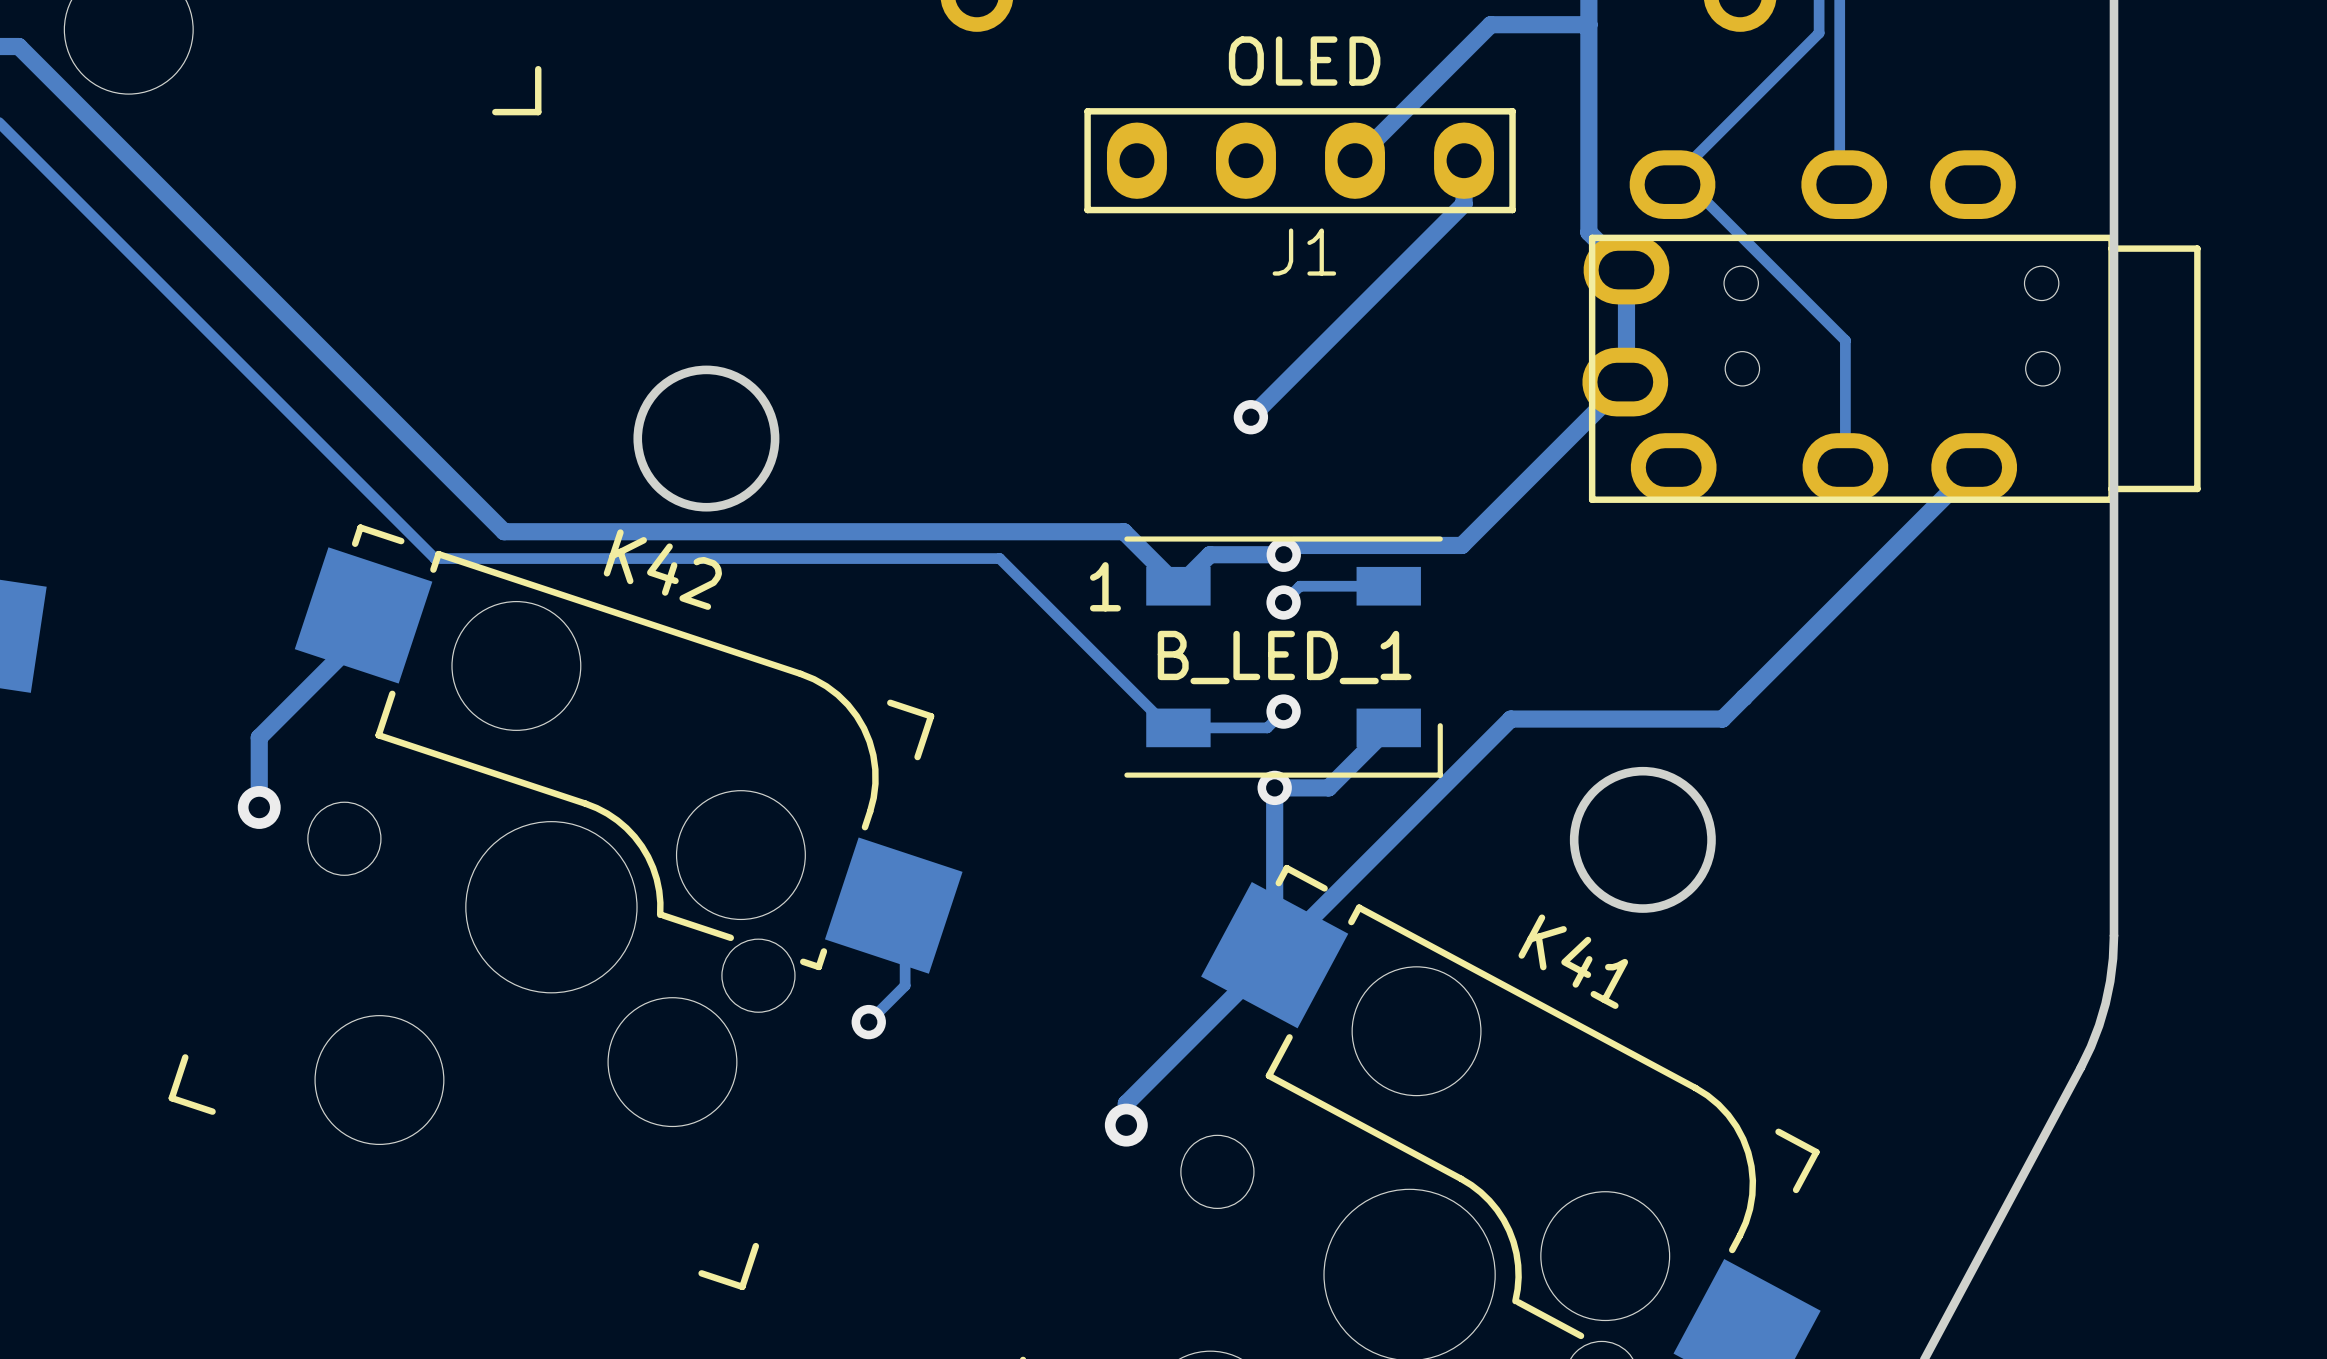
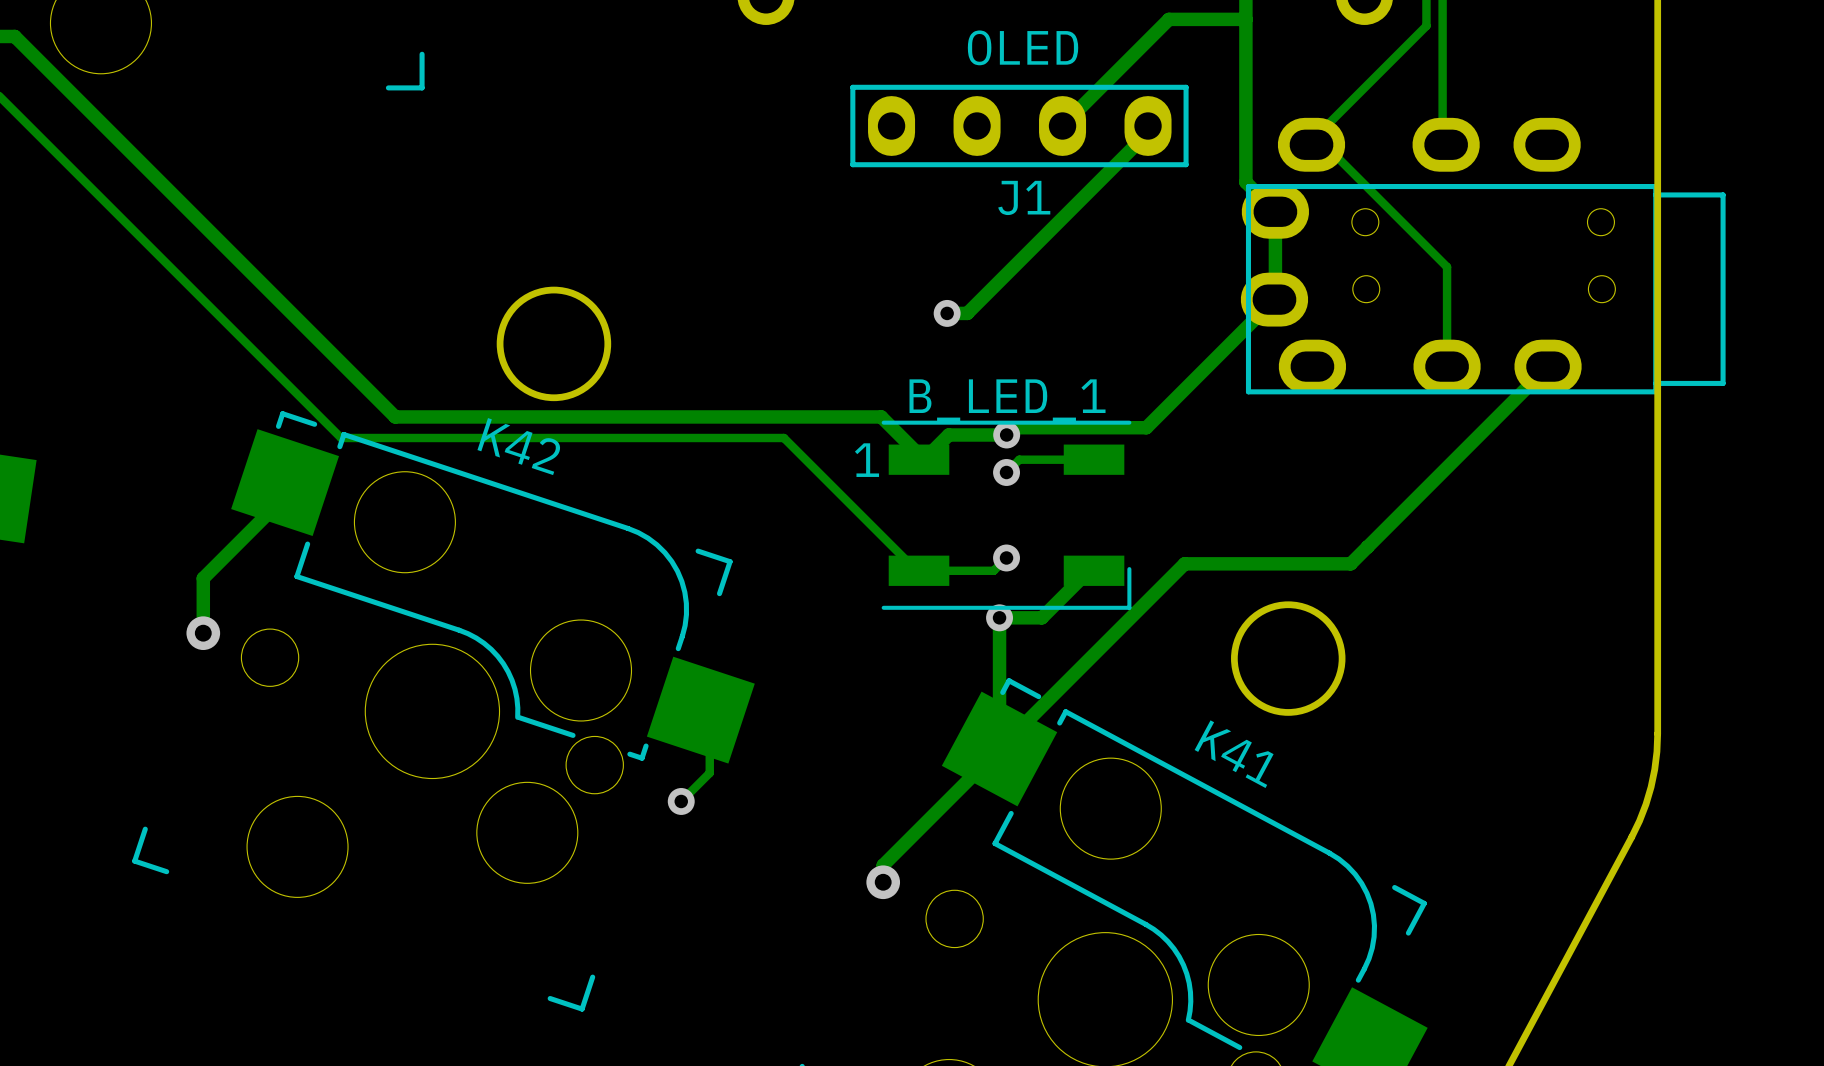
track: (1464, 169) (1464, 204) (1250, 417) -> (1148, 132) (967, 313) (947, 313)
via position: (1250, 417) -> (947, 313)
B_LED_1 footprint: [1124, 536, 1443, 778] -> [881, 420, 1132, 610]
B_LED_1 name position: B_LED_1 (1284, 657) -> B_LED_1 (1007, 400)

